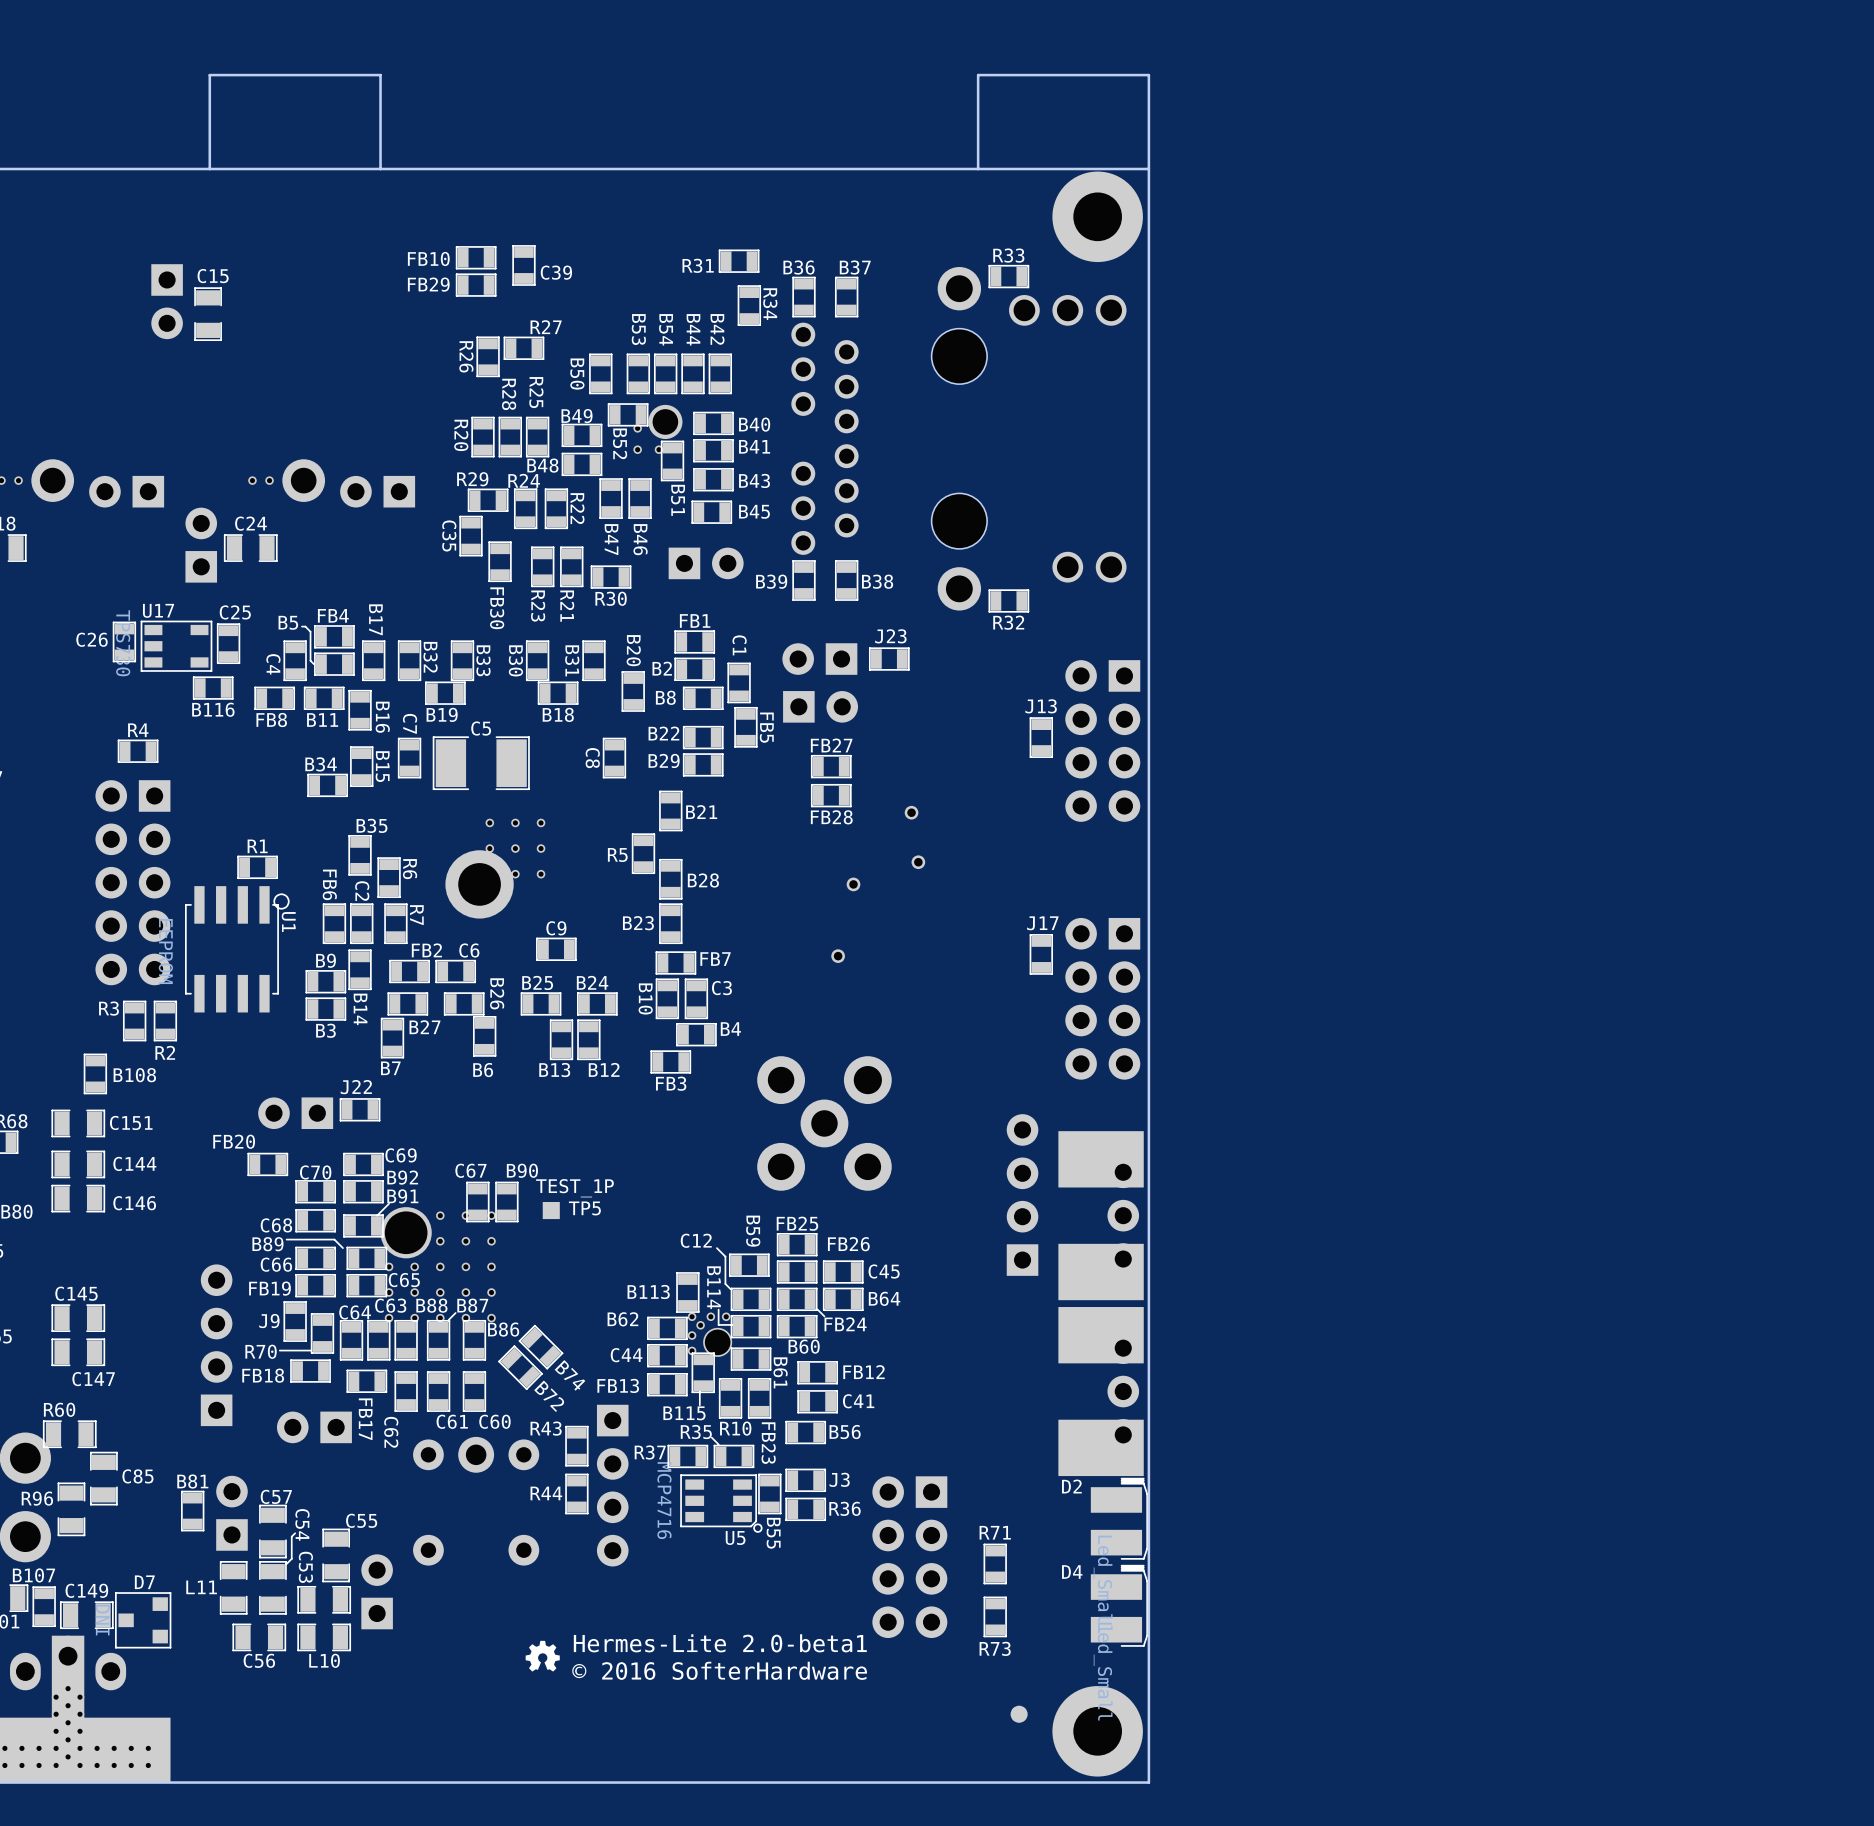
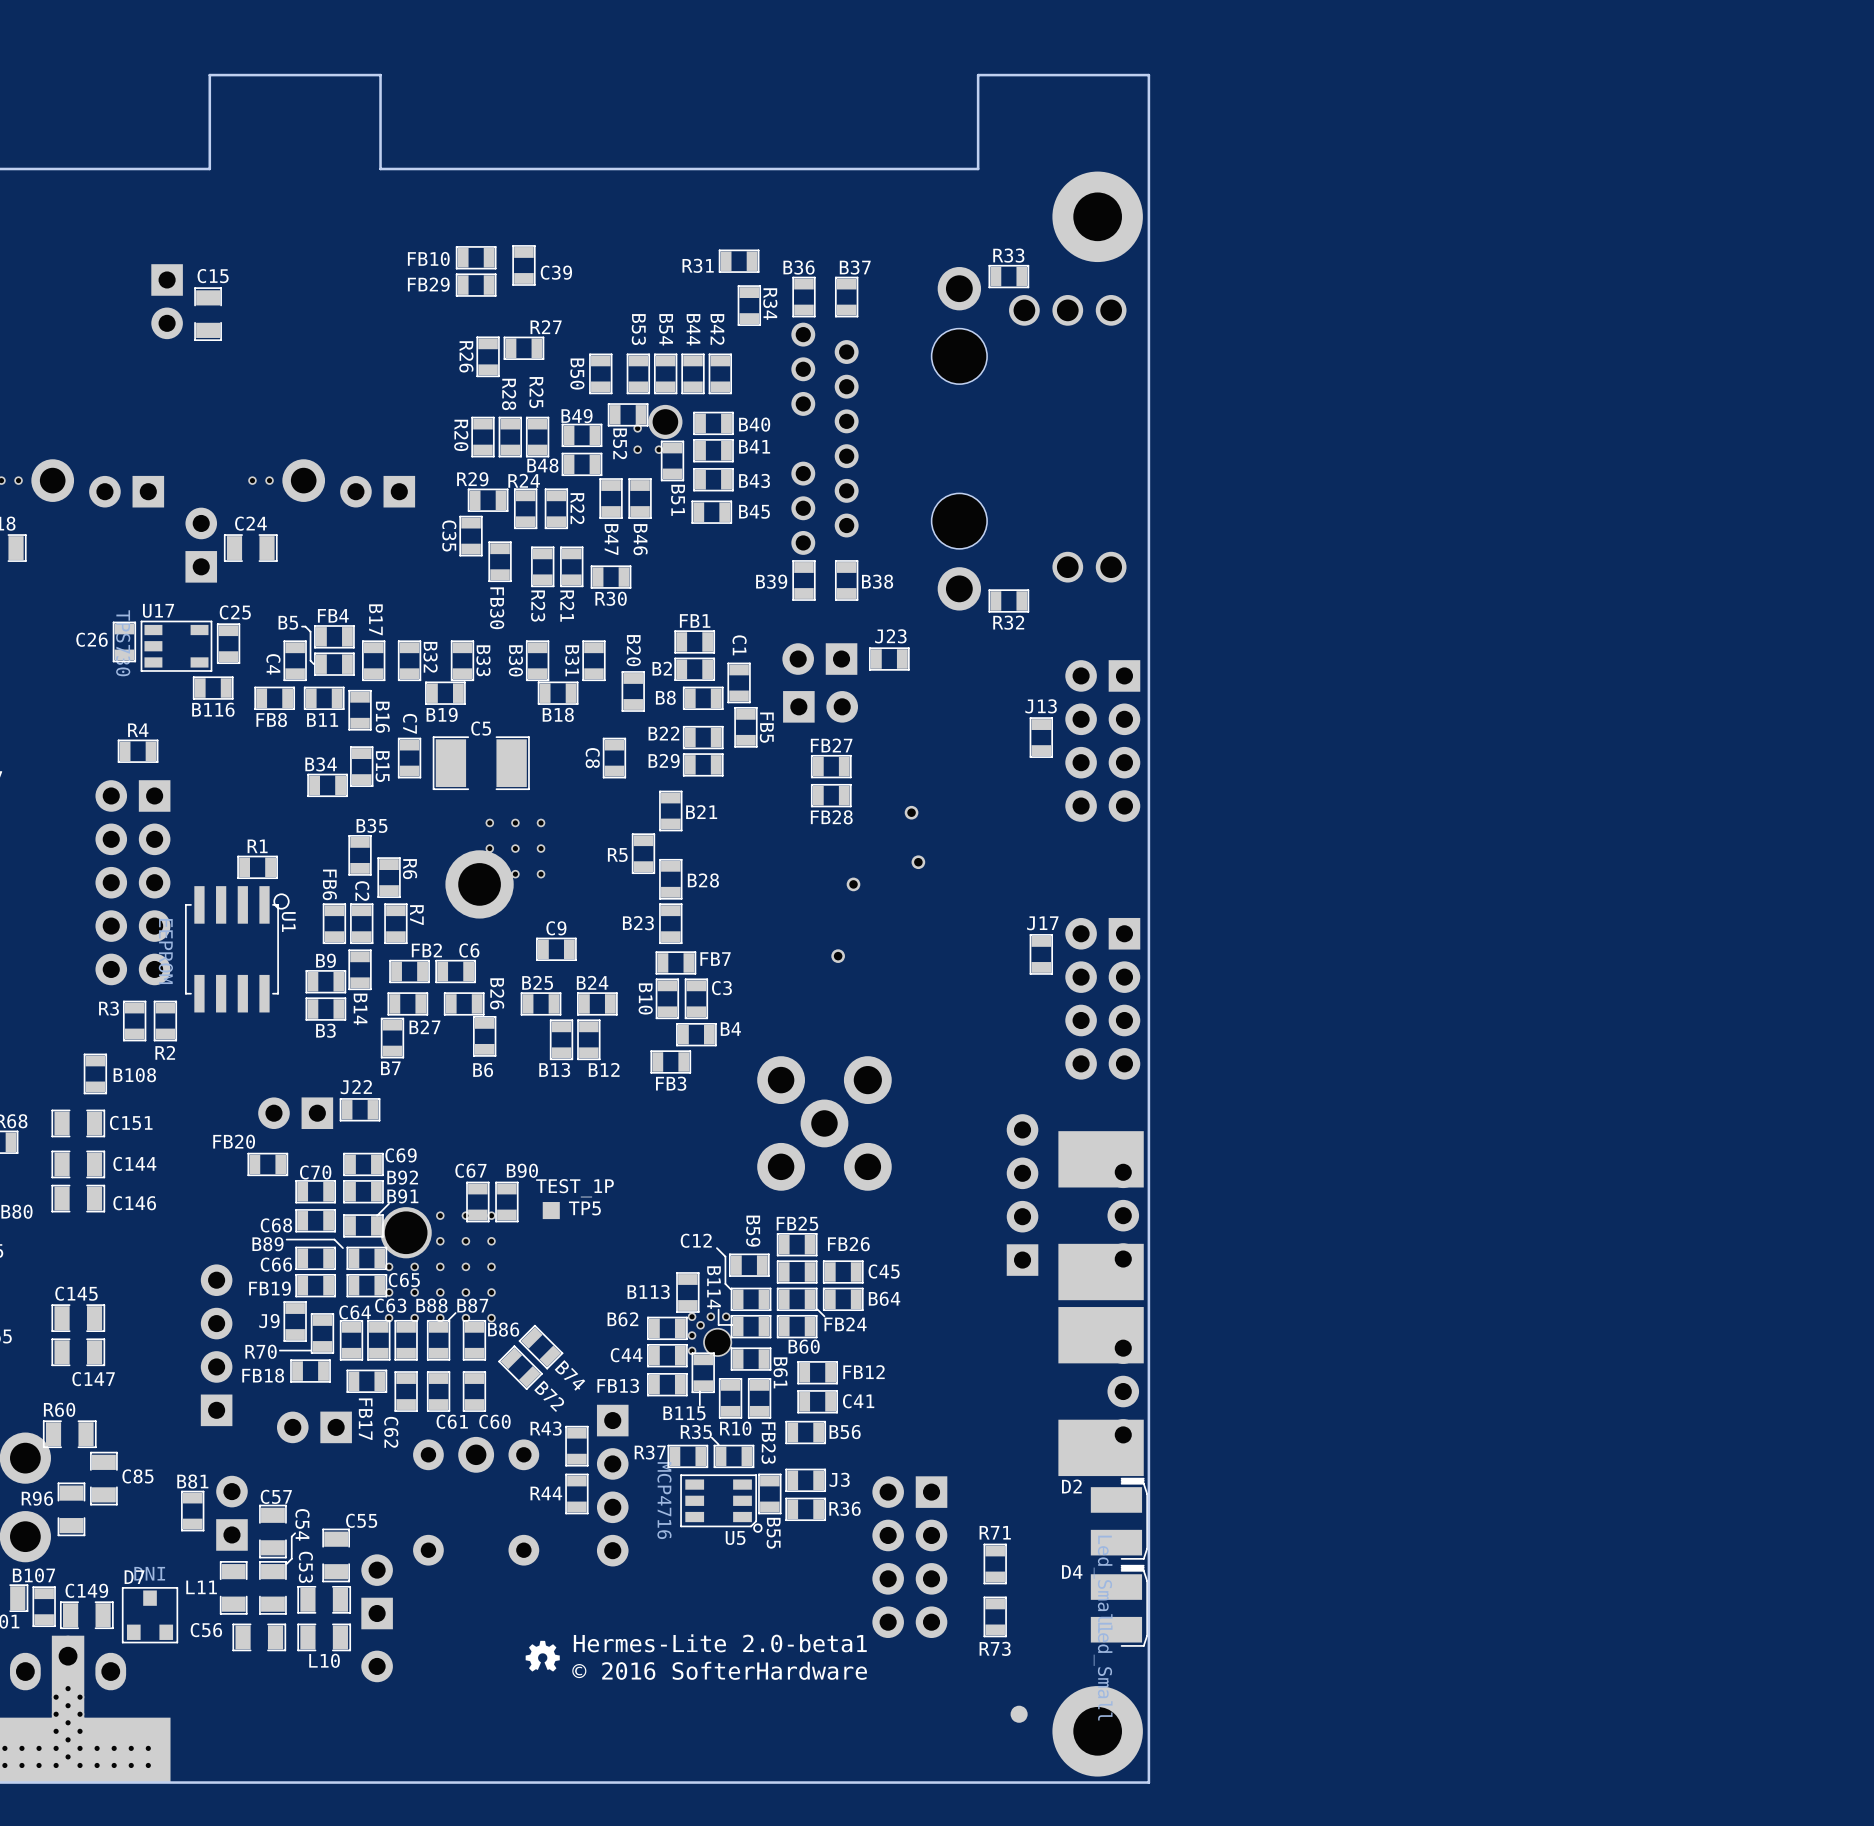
board edge: (380, 168) (209, 168) -> none
board edge: (1148, 168) (978, 168) -> none
part: (706, 563) -> none
D7 rotation: 0° (143, 1620) -> 90° clockwise (150, 1615)
C56 name position: C56 (259, 1660) -> C56 (206, 1630)
part: none -> (377, 1666)

